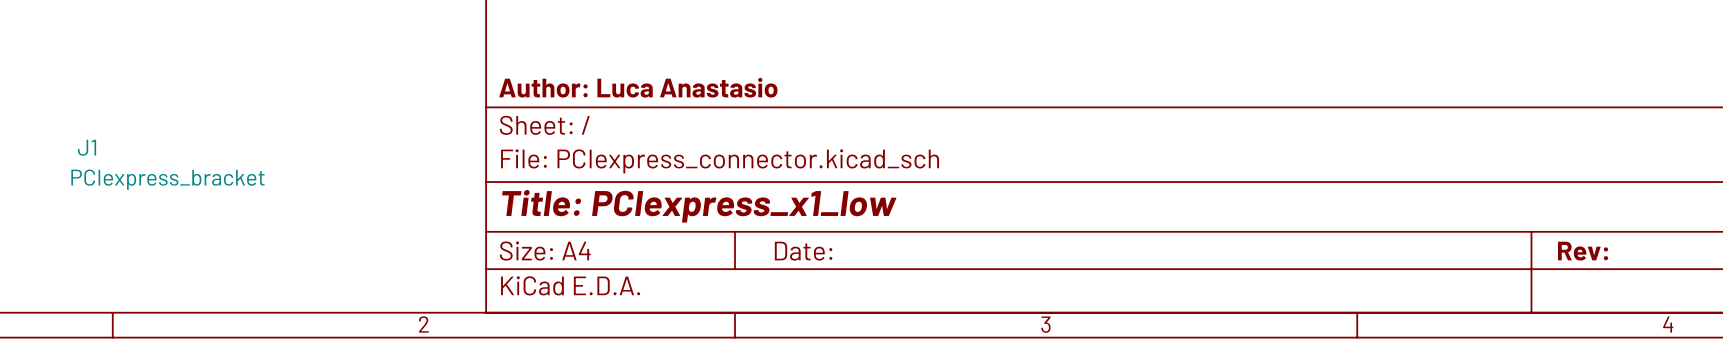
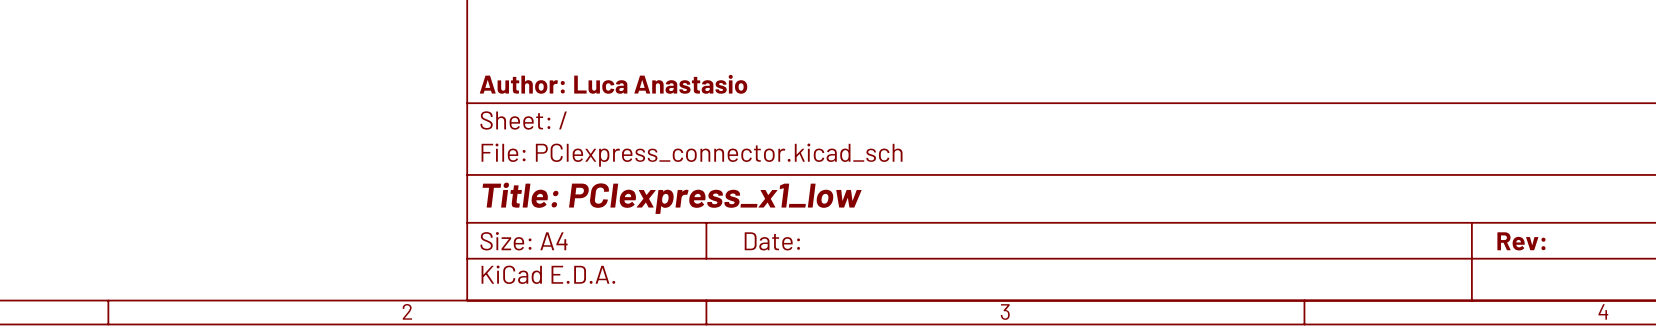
J1: PCIexpress_bracket (167, 164) -> none

